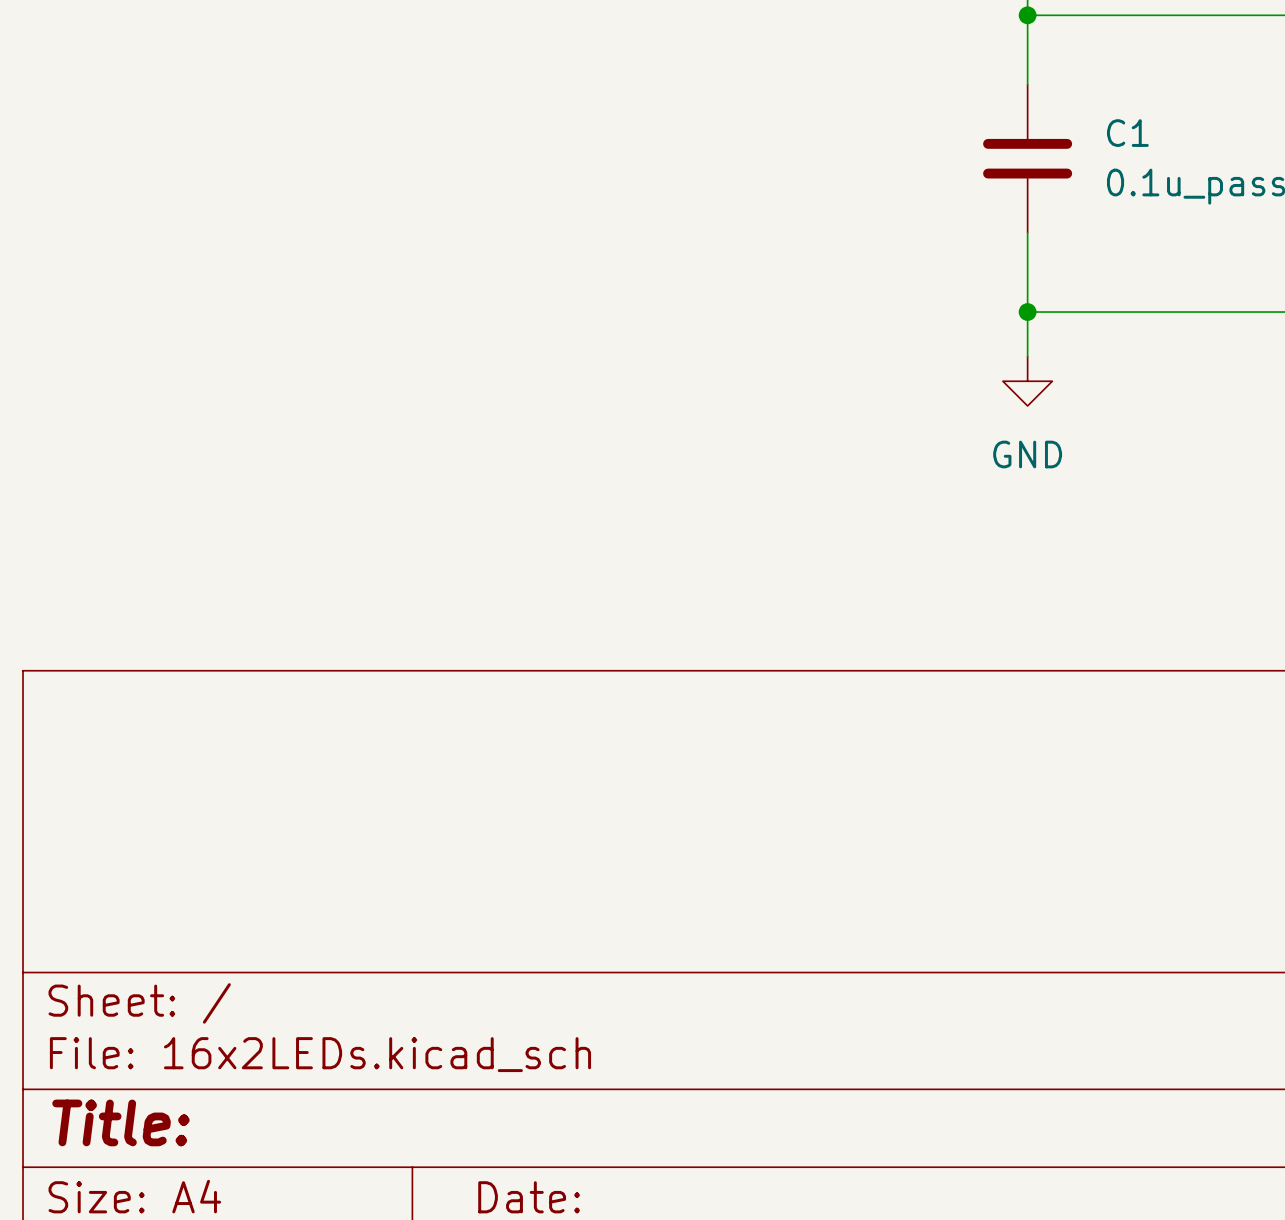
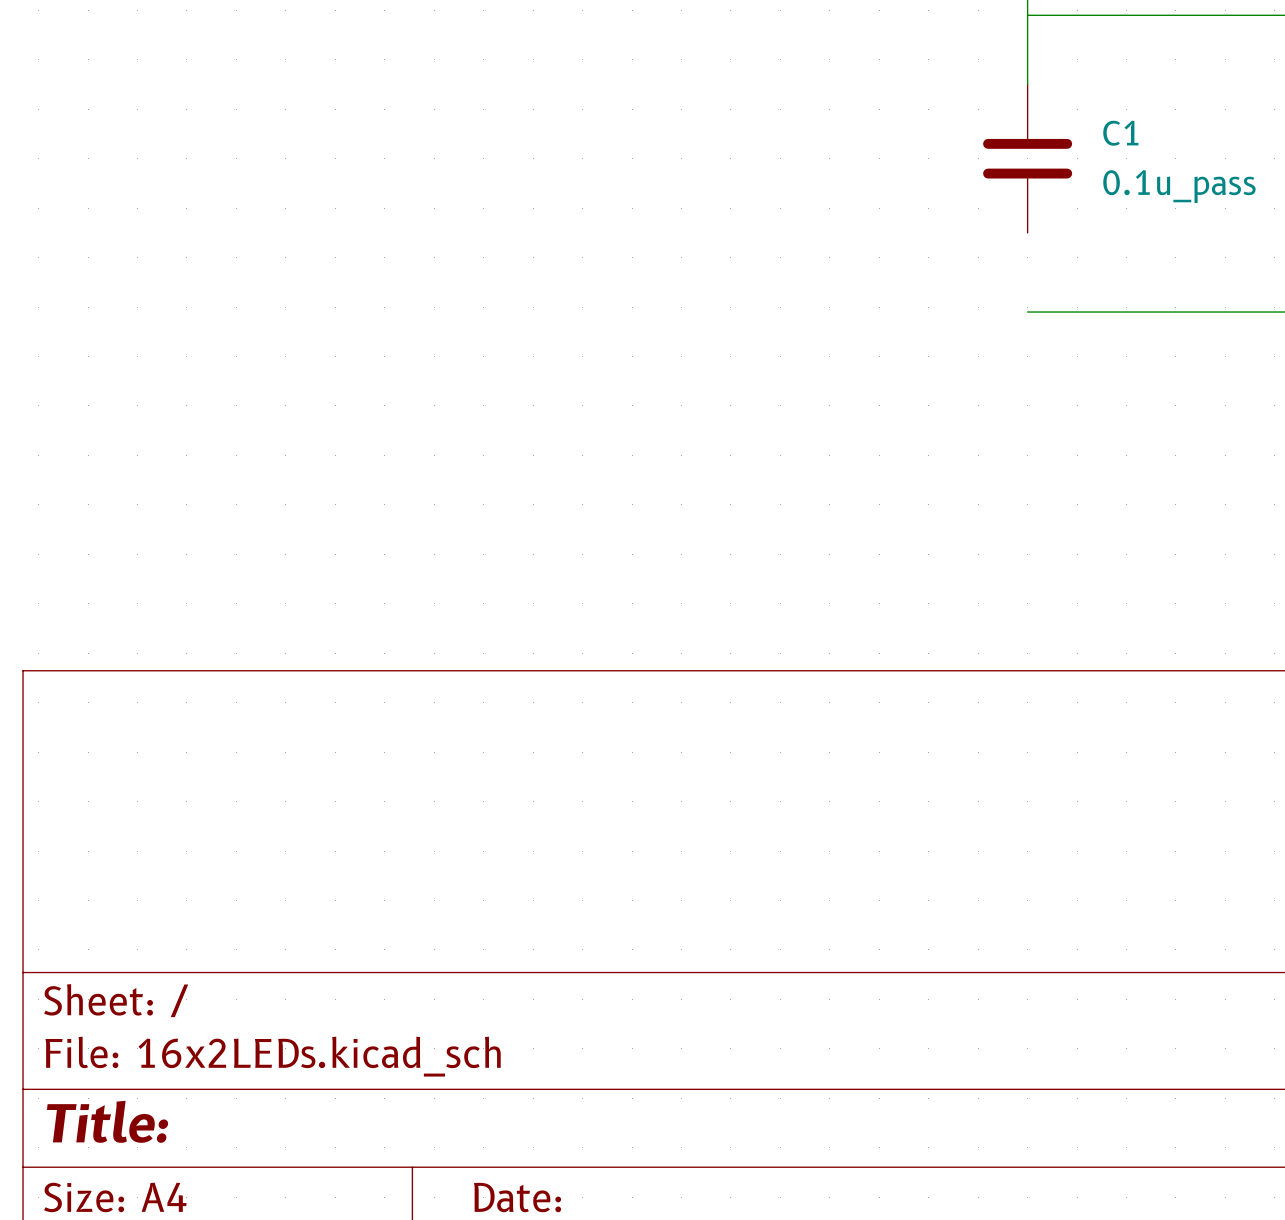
junction: (1027, 15) -> none
wire: (1027, 232) (1027, 356) -> none
junction: (1027, 312) -> none
power symbol: GND (1027, 381) -> none

